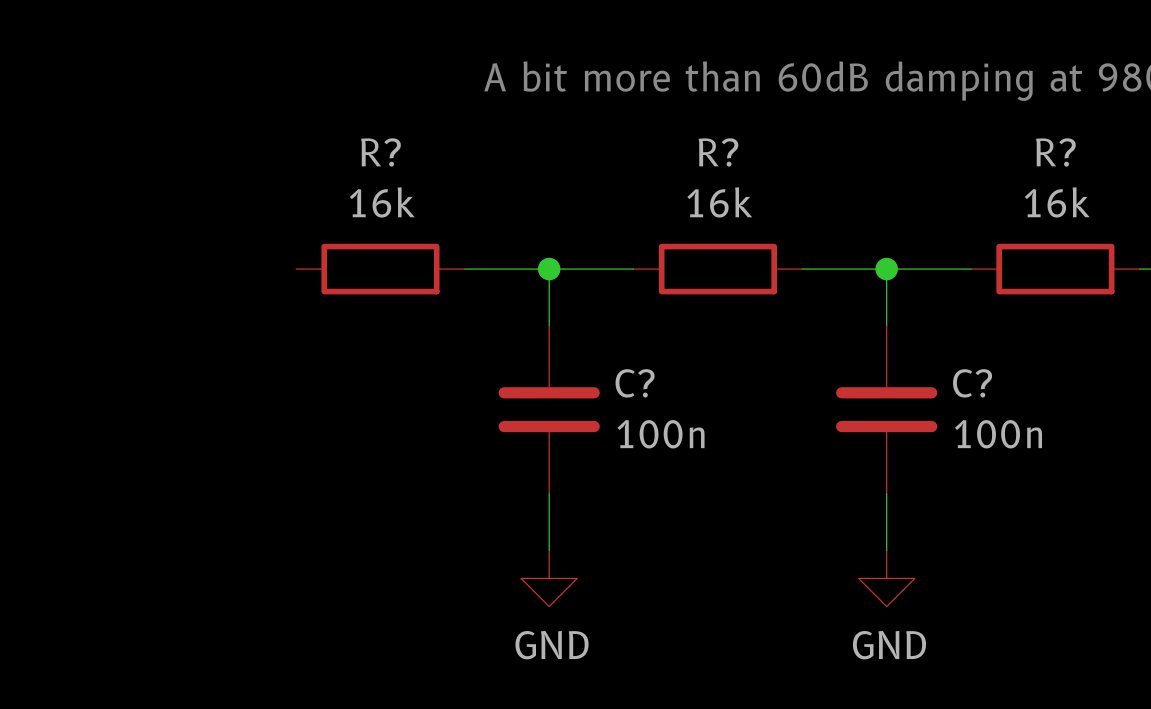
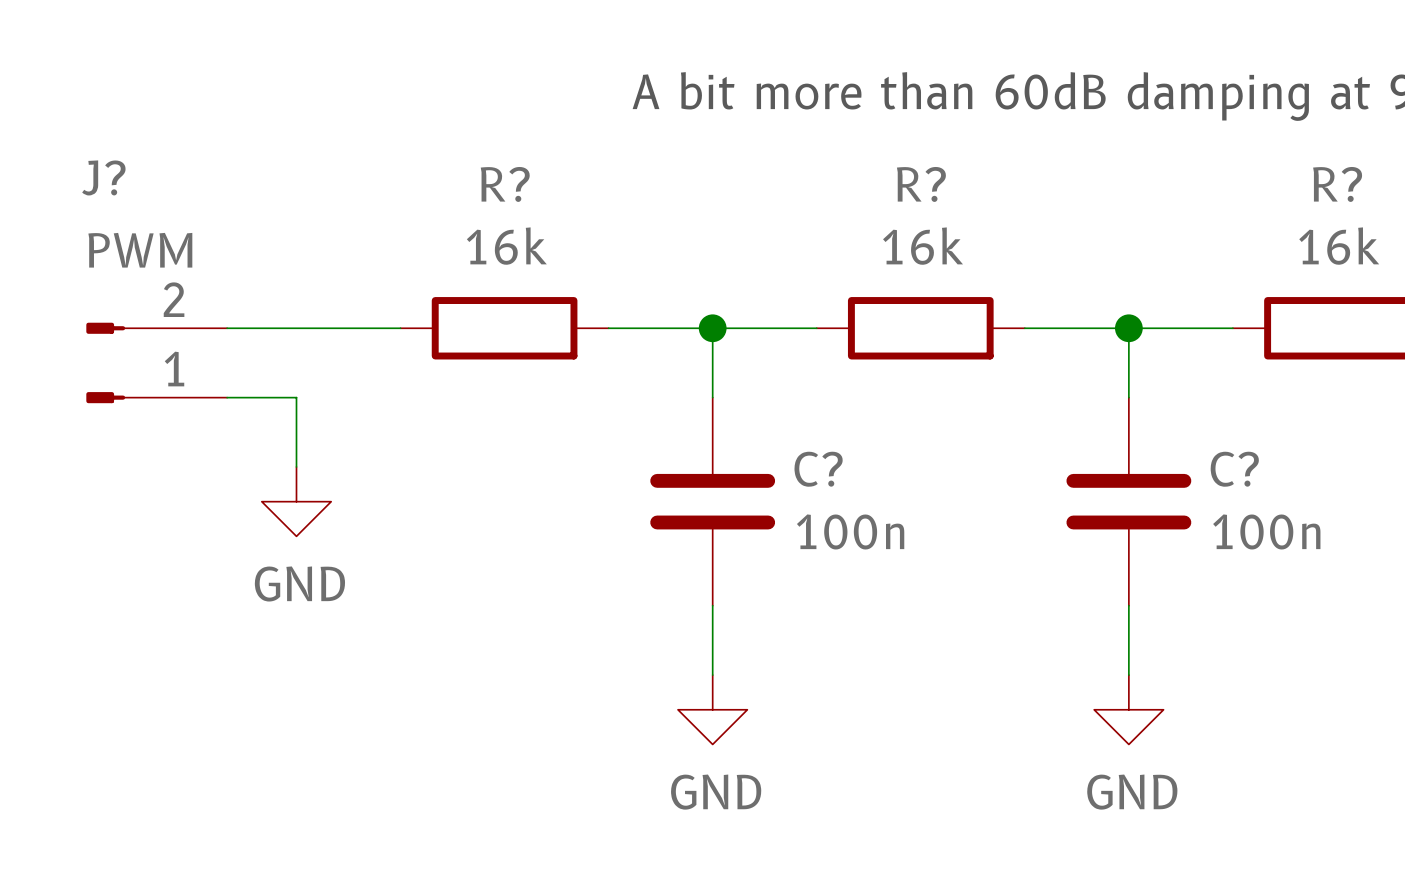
wire: none -> (227, 328) (400, 328)
J?: none -> PWM (156, 362)
wire: none -> (227, 397) (296, 397) (296, 466)
power symbol: none -> GND (296, 501)

